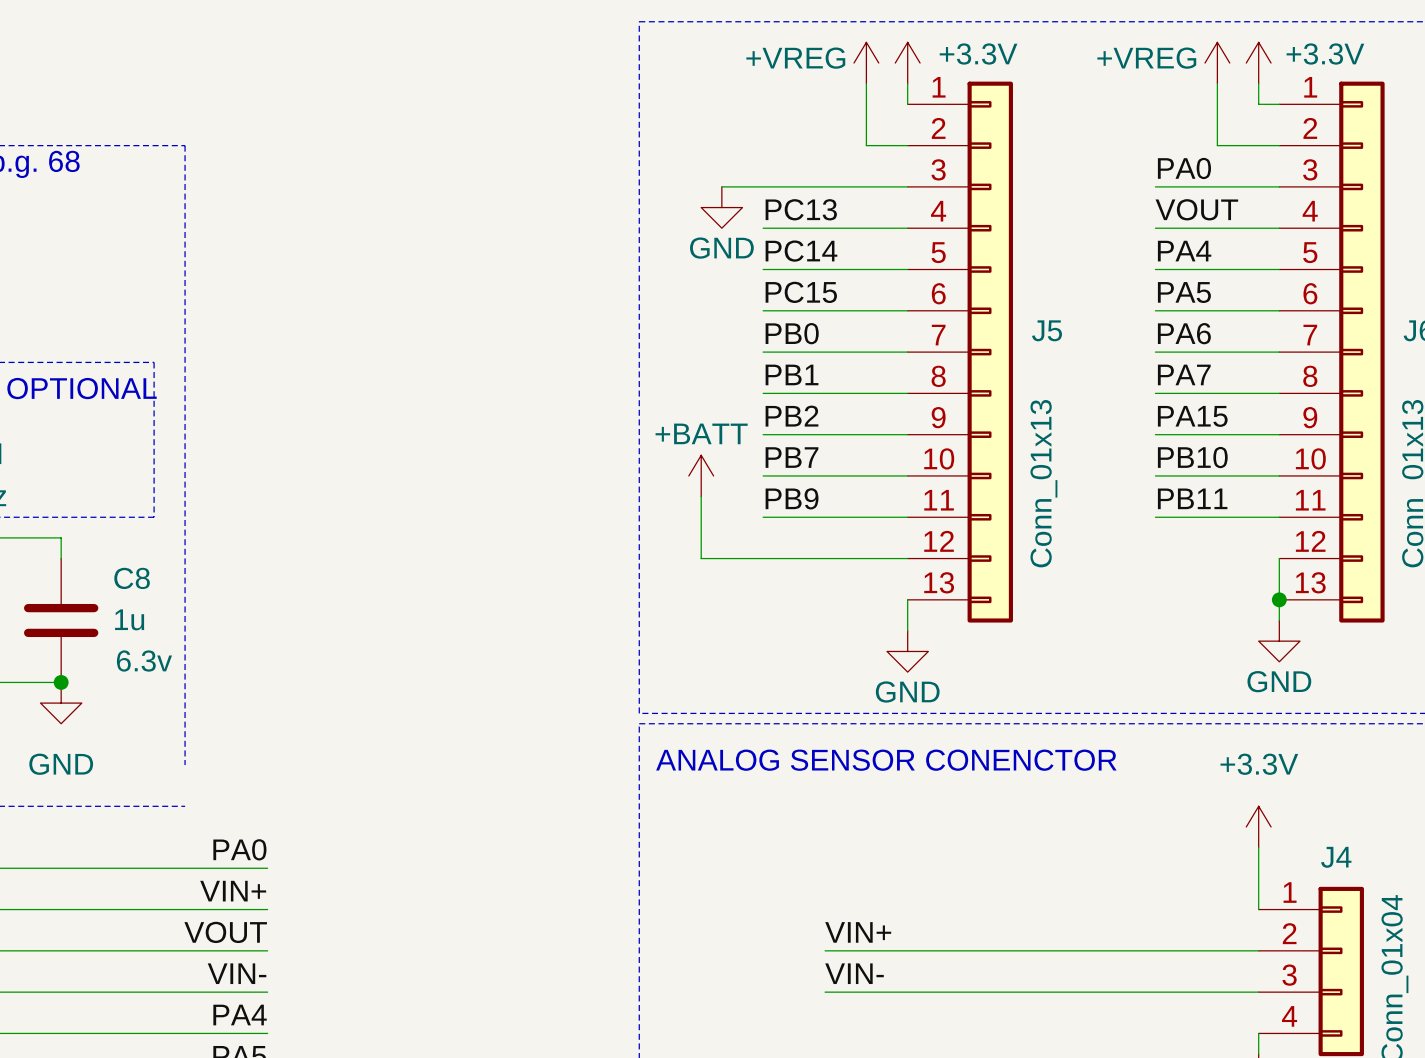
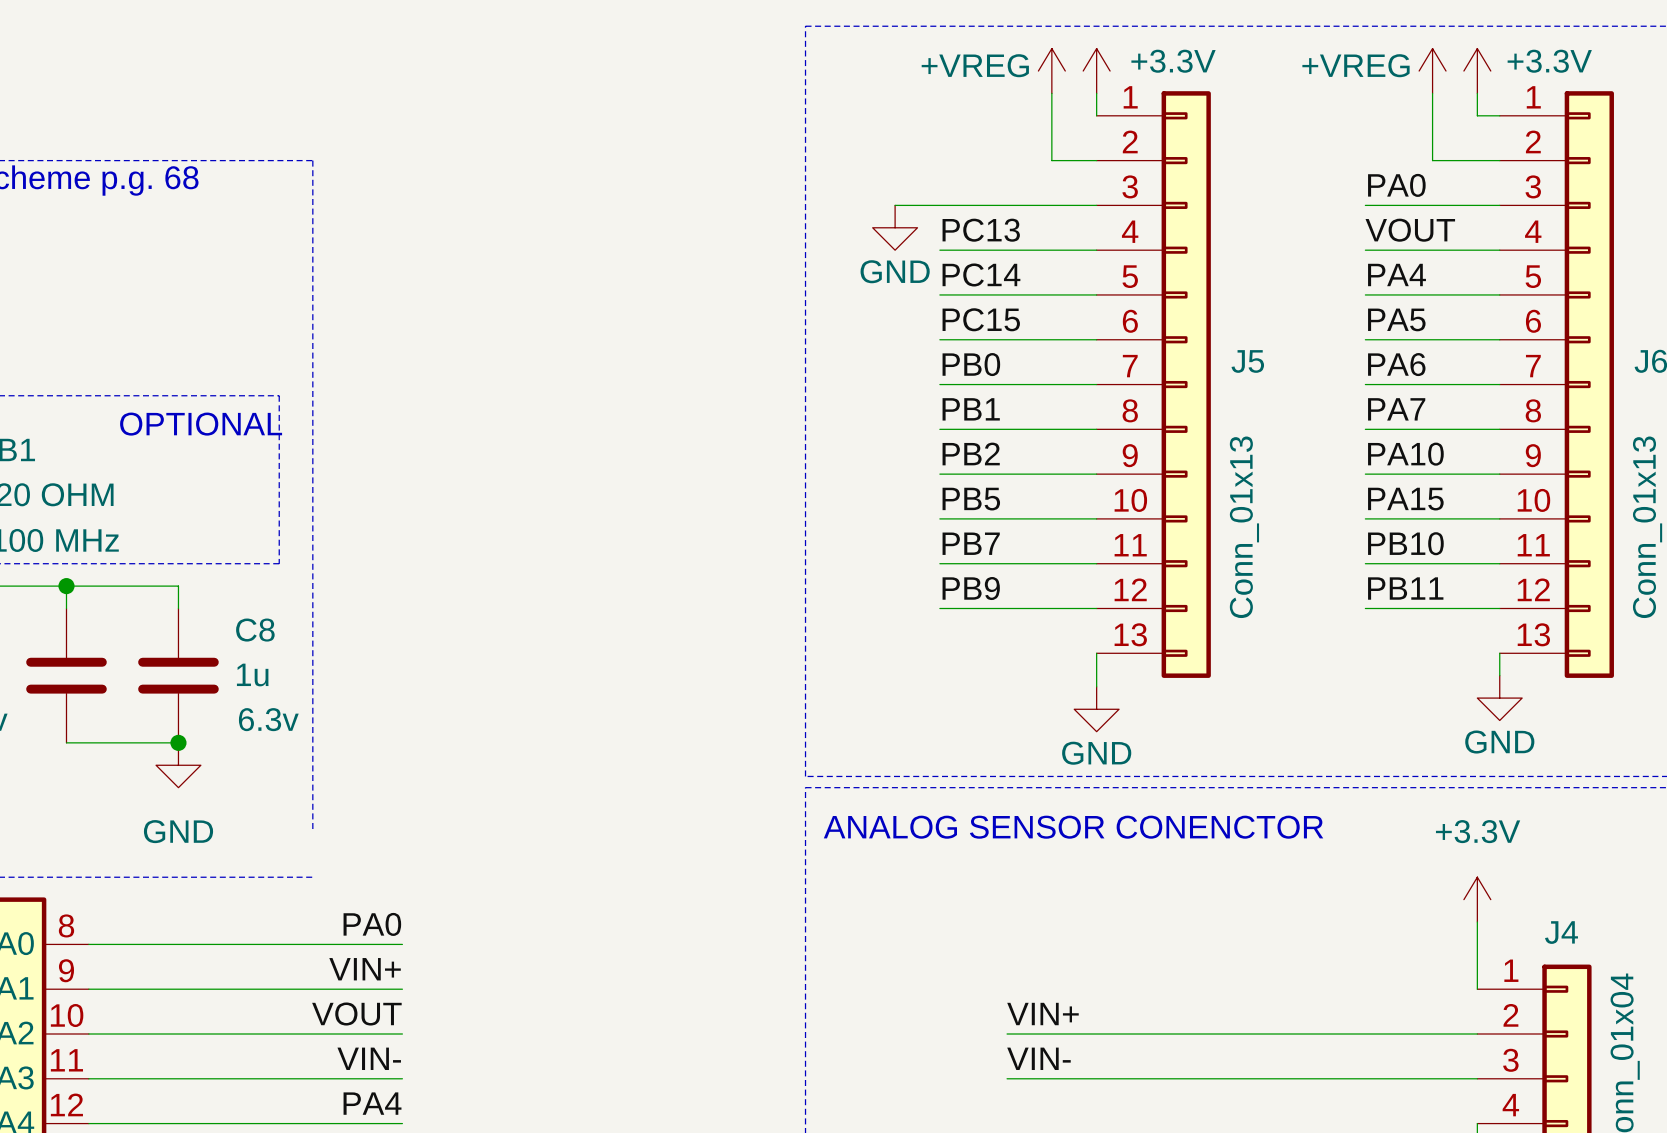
label: PA15 (1192, 416) -> PA10 (1405, 454)
label: PB7 (791, 457) -> PB5 (971, 499)
label: PB10 (1192, 457) -> PA15 (1405, 499)
power symbol: +BATT (701, 475) -> none
wire: (701, 496) (701, 558) (763, 558) -> none
label: PB9 (792, 498) -> PB7 (971, 543)
label: PB11 (1192, 498) -> PB10 (1405, 543)
label: none -> PB9 (971, 588)
label: none -> PB11 (1405, 588)
wire: (1279, 558) (1279, 599) -> (1499, 608) (1365, 608)
junction: (1279, 599) -> none

